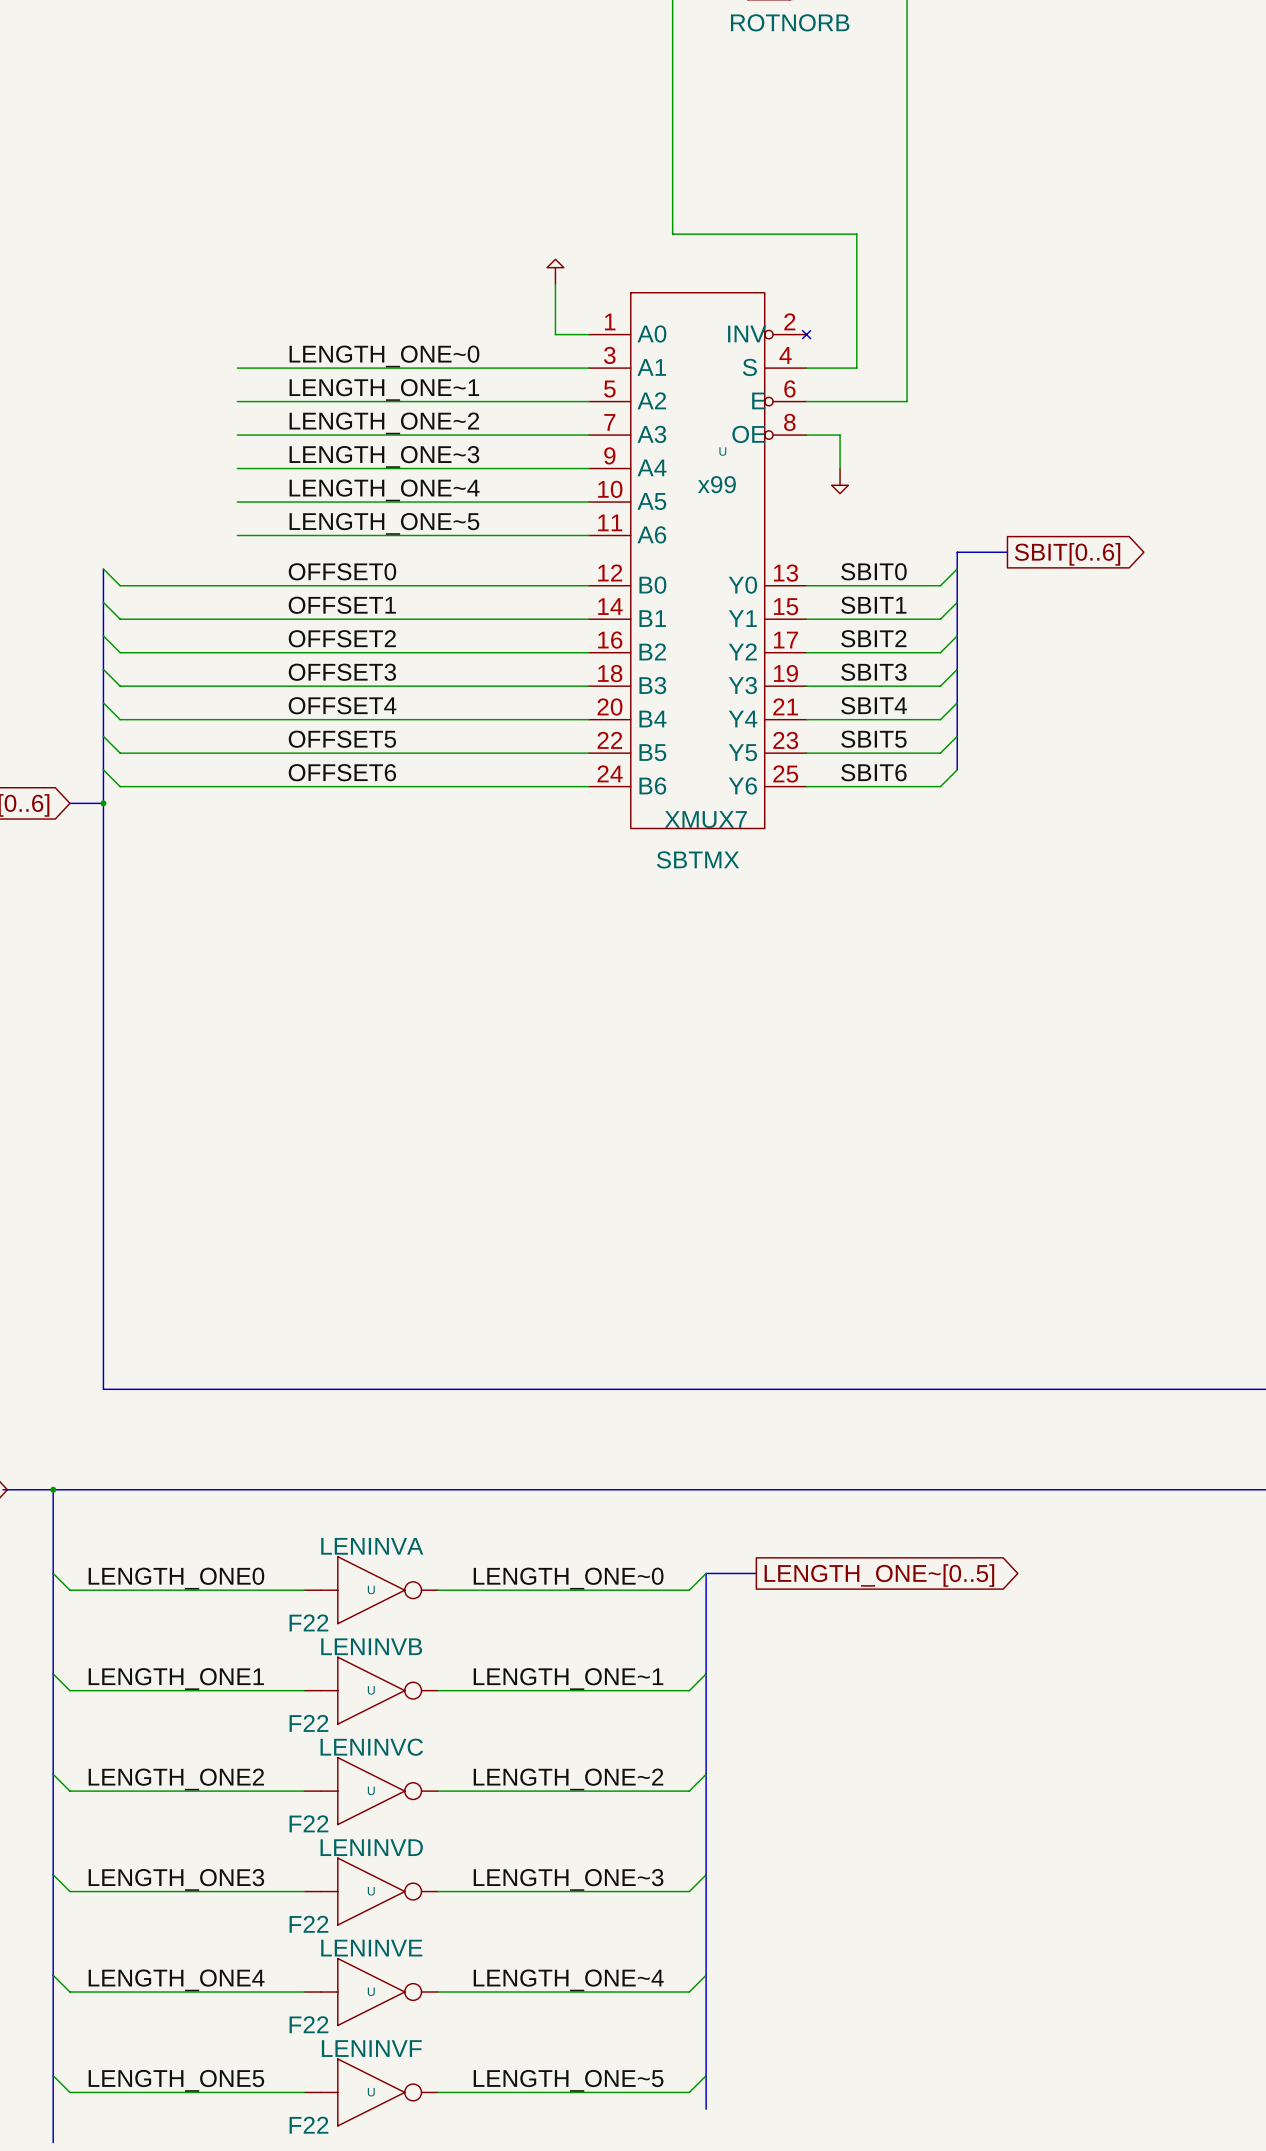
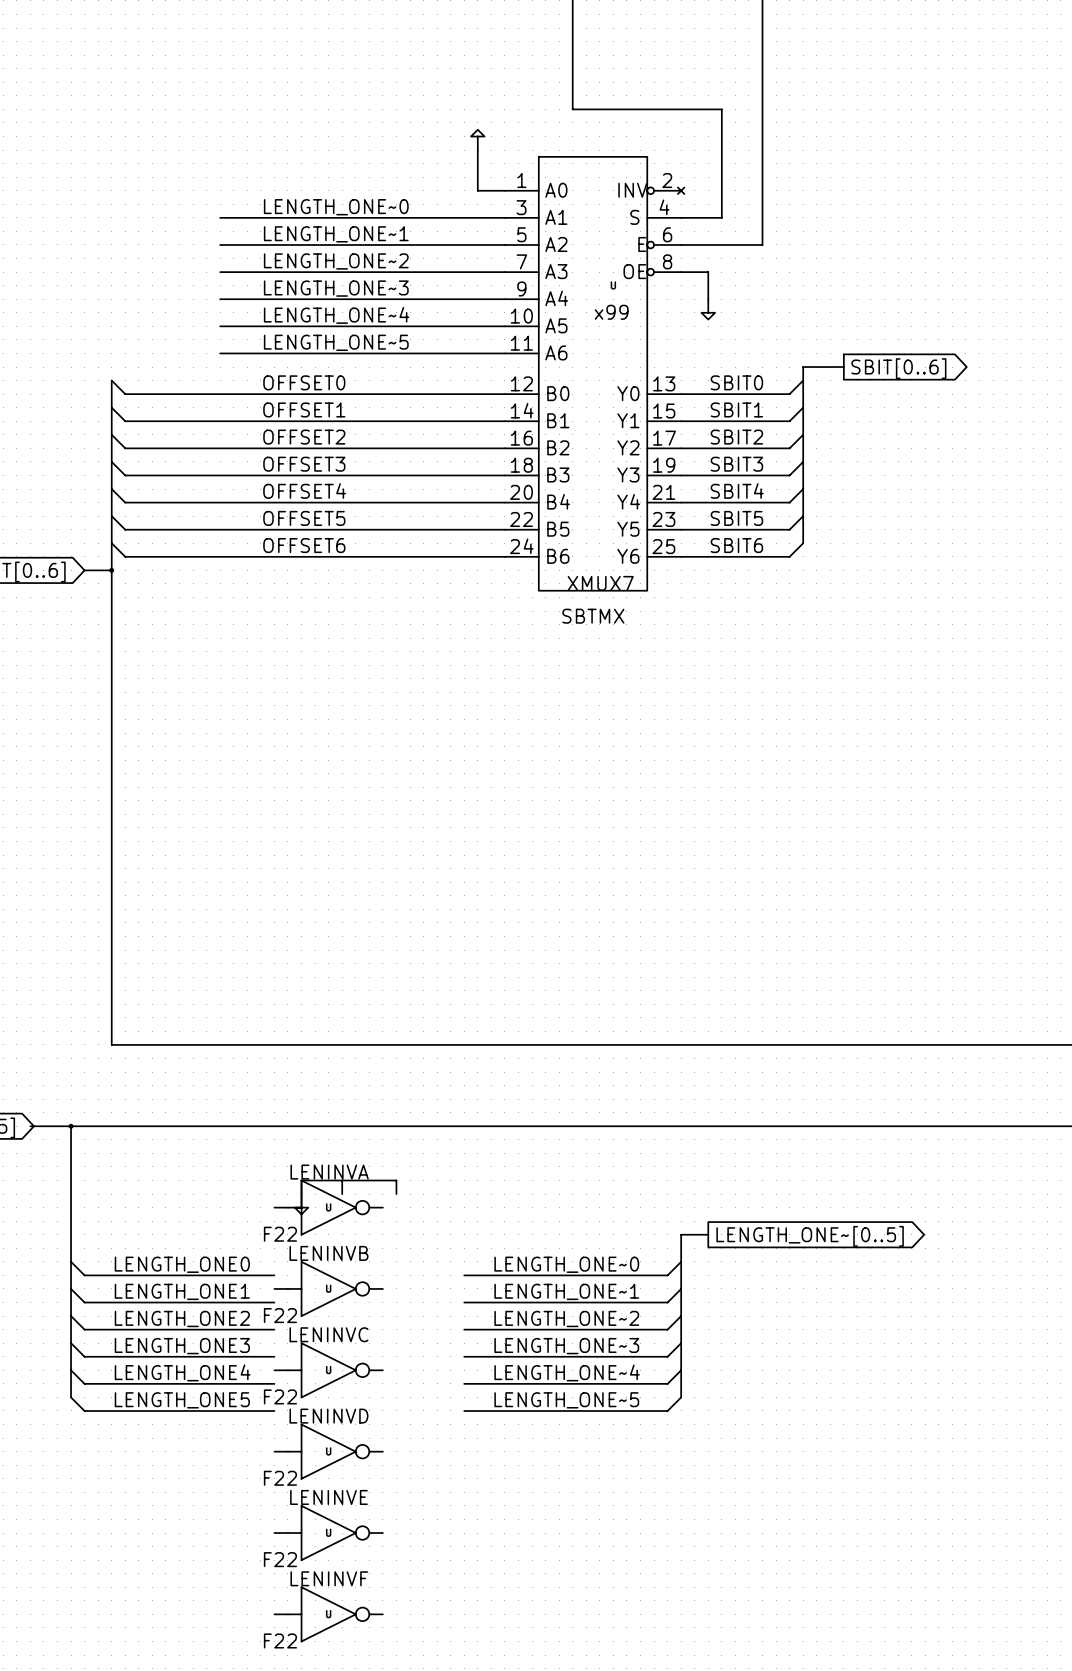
wire: none -> (342, 1180) (342, 1194)
wire: (53, 1573) (69, 1590) (304, 1590) -> (71, 1261) (84, 1275) (274, 1275)
wire: none -> (301, 1194) (301, 1180) (396, 1180) (396, 1194)
wire: (706, 1573) (689, 1590) (438, 1590) -> (681, 1261) (667, 1275) (464, 1275)
bus: (756, 1573) (706, 1573) (706, 2109) -> none
global label position: LENGTH_ONE~[0..5] (879, 1575) -> LENGTH_ONE~[0..5] (810, 1236)
label position: LENGTH_ONE0 (176, 1578) -> LENGTH_ONE0 (182, 1264)
label position: LENGTH_ONE~0 (568, 1578) -> LENGTH_ONE~0 (566, 1264)
power symbol: none -> (301, 1204)
bus: none -> (708, 1234) (681, 1234) (681, 1397)
wire: (53, 1673) (69, 1690) (304, 1690) -> (71, 1288) (84, 1302) (274, 1302)
wire: (706, 1673) (689, 1690) (438, 1690) -> (681, 1288) (667, 1302) (464, 1302)
label position: LENGTH_ONE1 (176, 1679) -> LENGTH_ONE1 (182, 1291)
label position: LENGTH_ONE~1 (568, 1679) -> LENGTH_ONE~1 (566, 1291)
wire: none -> (71, 1316) (84, 1329) (274, 1329)
wire: none -> (681, 1316) (667, 1329) (464, 1329)
wire: (53, 1774) (69, 1791) (304, 1791) -> (71, 1343) (84, 1356) (274, 1356)
wire: (706, 1774) (689, 1791) (438, 1791) -> (681, 1343) (667, 1356) (464, 1356)
label position: LENGTH_ONE2 (176, 1779) -> LENGTH_ONE2 (182, 1319)
label position: LENGTH_ONE~2 (568, 1779) -> LENGTH_ONE~2 (566, 1319)
wire: none -> (71, 1370) (84, 1383) (274, 1383)
wire: none -> (681, 1370) (667, 1383) (464, 1383)
label: none -> LENGTH_ONE4 (182, 1372)
label: none -> LENGTH_ONE~4 (567, 1372)
bus: (53, 1824) (53, 2142) -> none
label: none -> LENGTH_ONE5 (182, 1400)
label: none -> LENGTH_ONE~5 (566, 1400)
wire: (53, 1874) (69, 1891) (304, 1891) -> (71, 1397) (84, 1410) (274, 1410)
wire: (706, 1874) (689, 1891) (438, 1891) -> (681, 1397) (667, 1410) (464, 1410)
label position: LENGTH_ONE3 (176, 1879) -> LENGTH_ONE3 (182, 1346)
label position: LENGTH_ONE~3 (568, 1879) -> LENGTH_ONE~3 (566, 1346)
wire: (53, 1975) (69, 1992) (304, 1992) -> none
wire: (706, 1975) (689, 1992) (438, 1992) -> none
label: LENGTH_ONE4 (176, 1980) -> none
label: LENGTH_ONE~4 (568, 1980) -> none
wire: (53, 2075) (69, 2092) (304, 2092) -> none
wire: (706, 2075) (689, 2092) (438, 2092) -> none
label: LENGTH_ONE5 (176, 2080) -> none
label: LENGTH_ONE~5 (568, 2080) -> none

